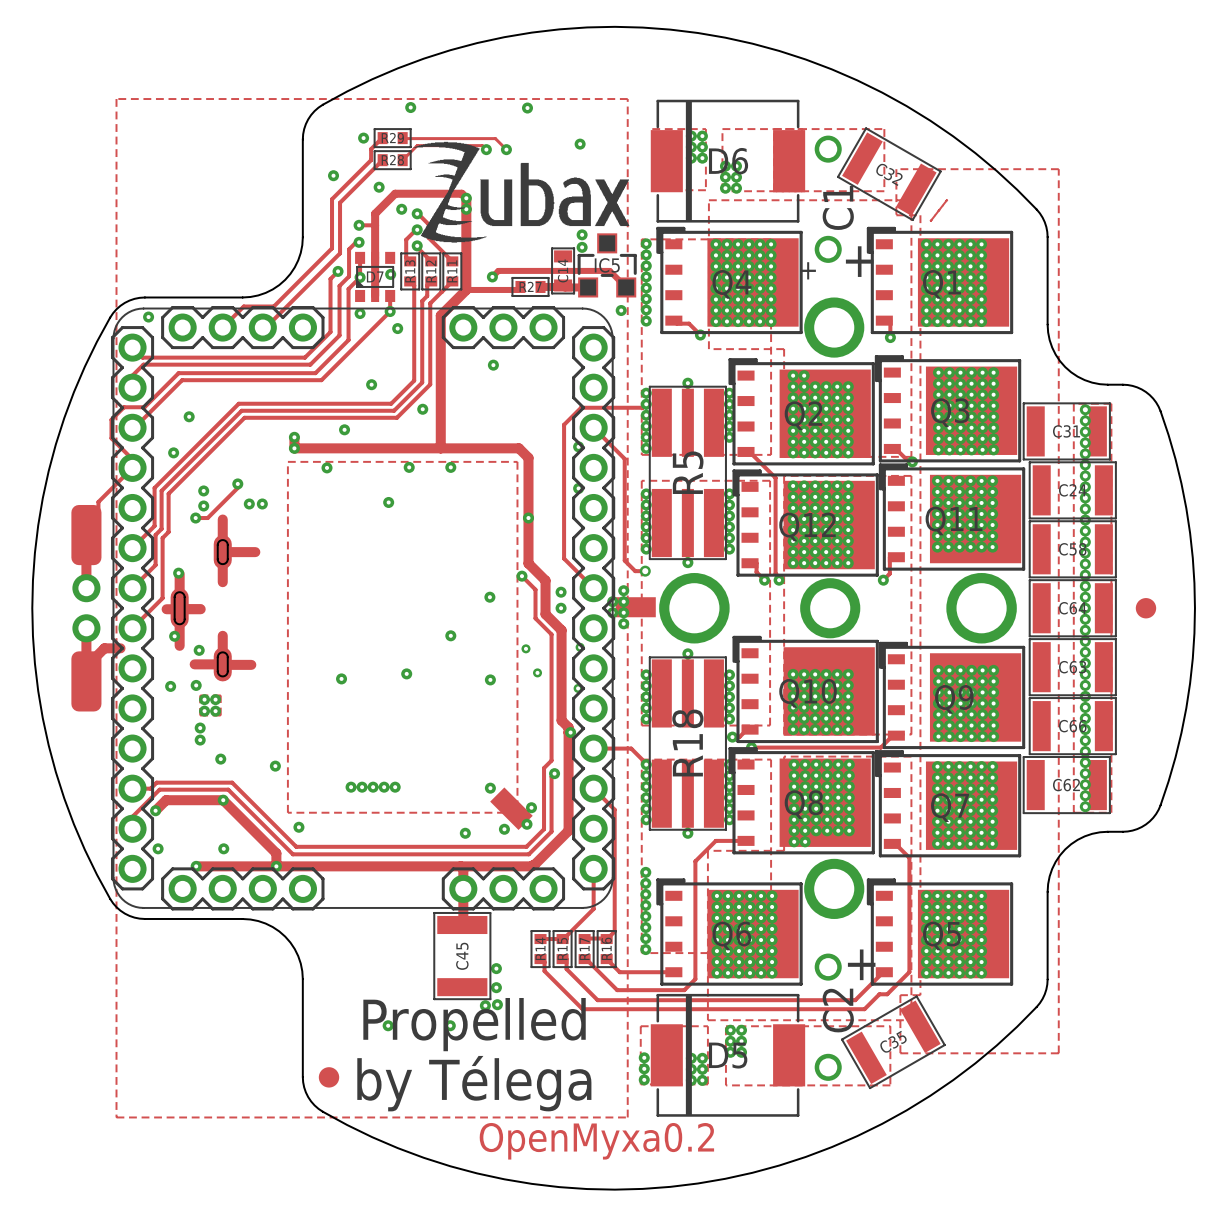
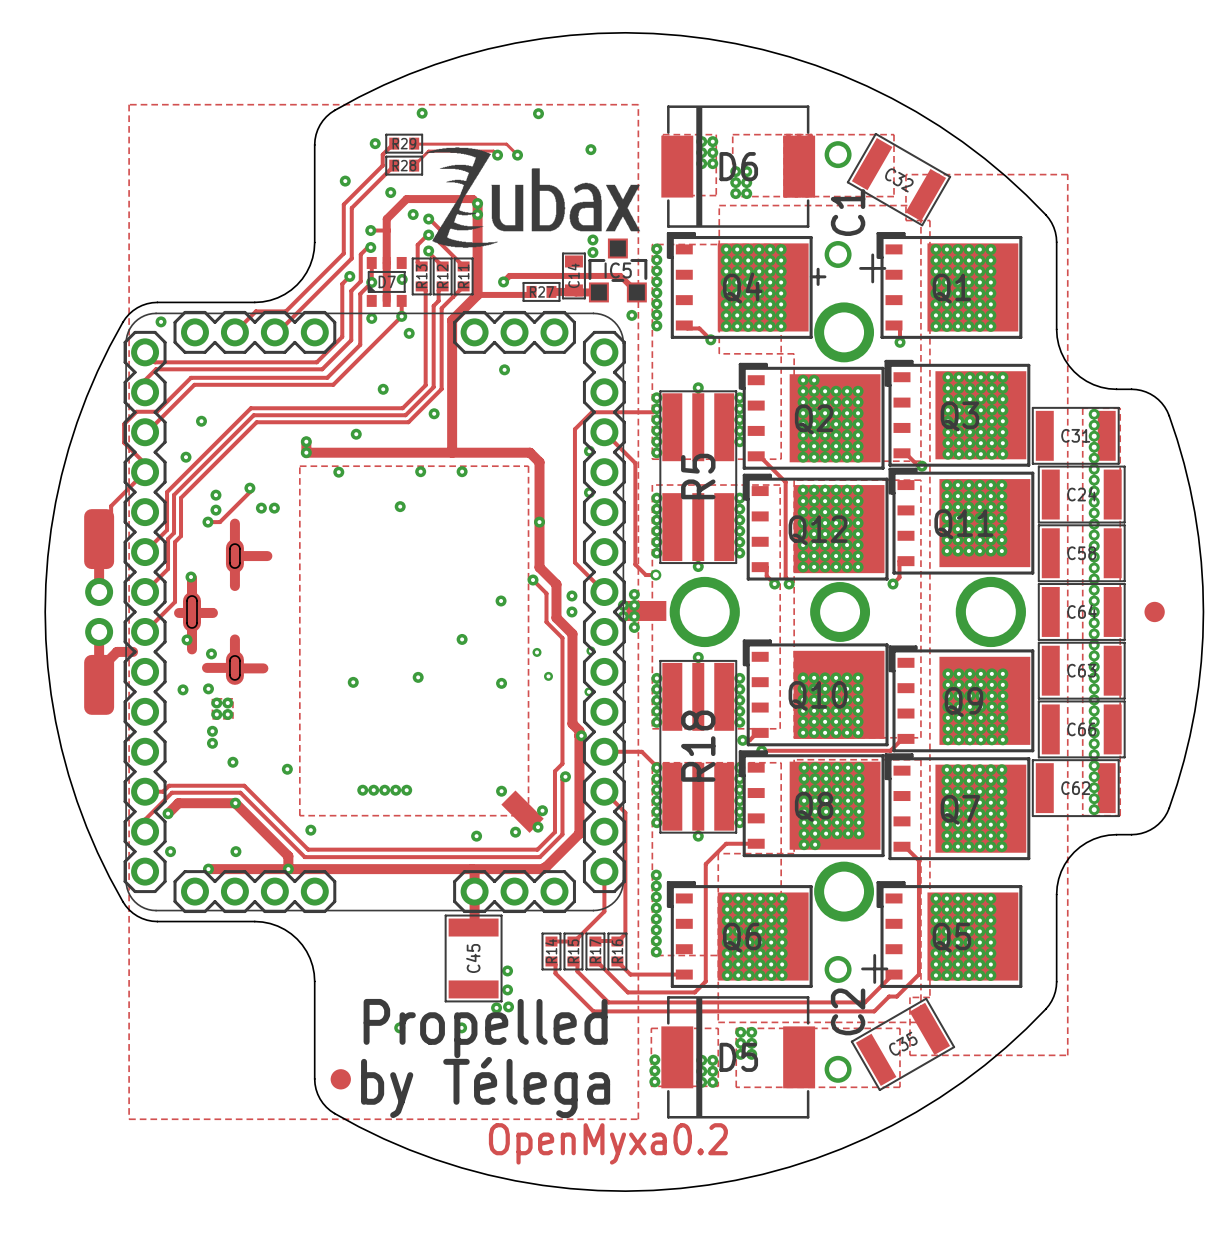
zone outline: (947, 199) (930, 221) -> none

